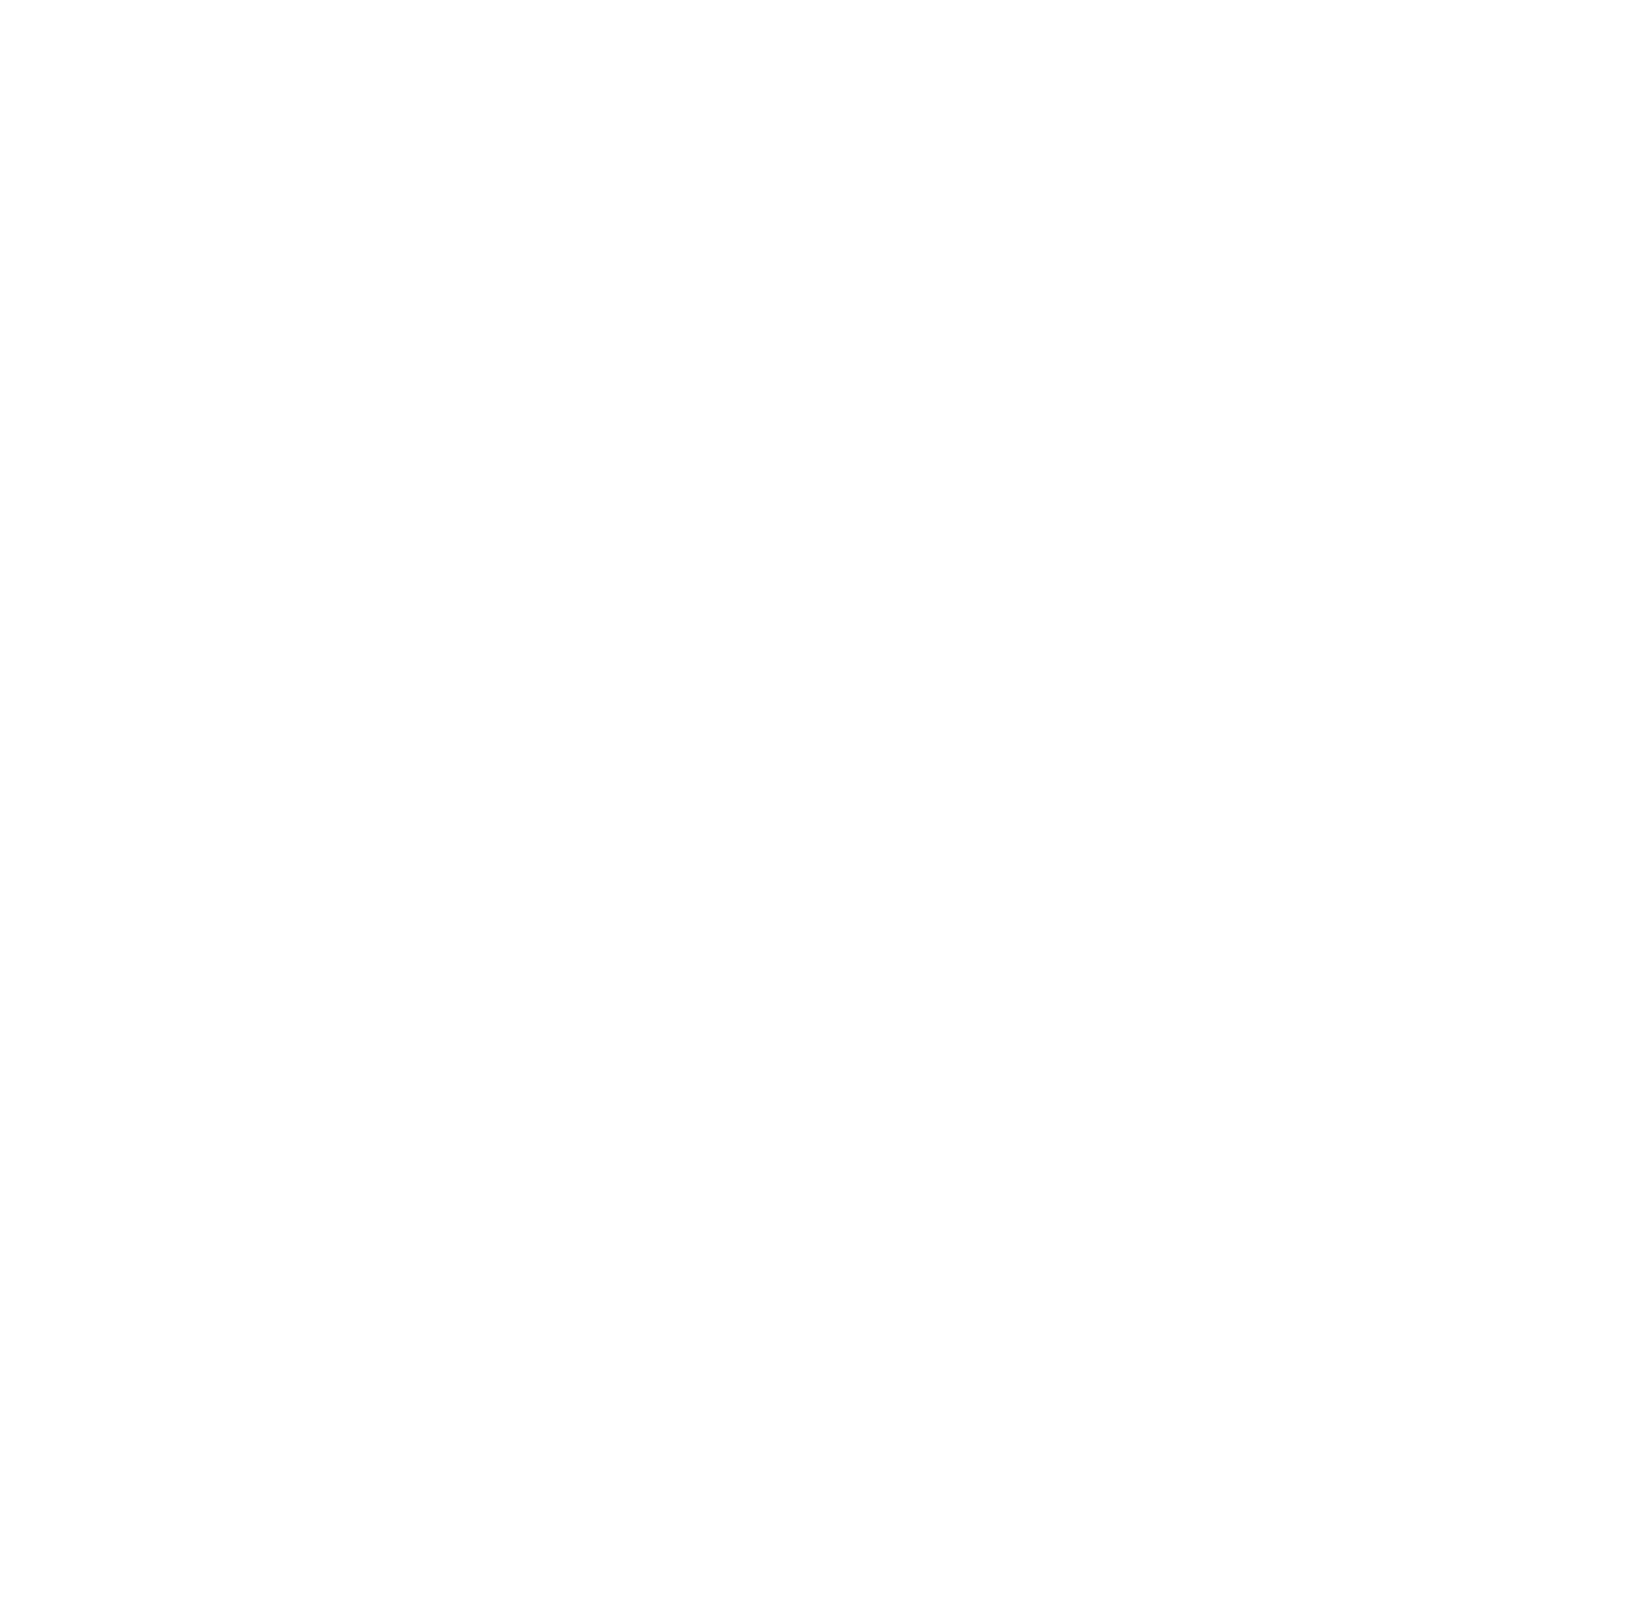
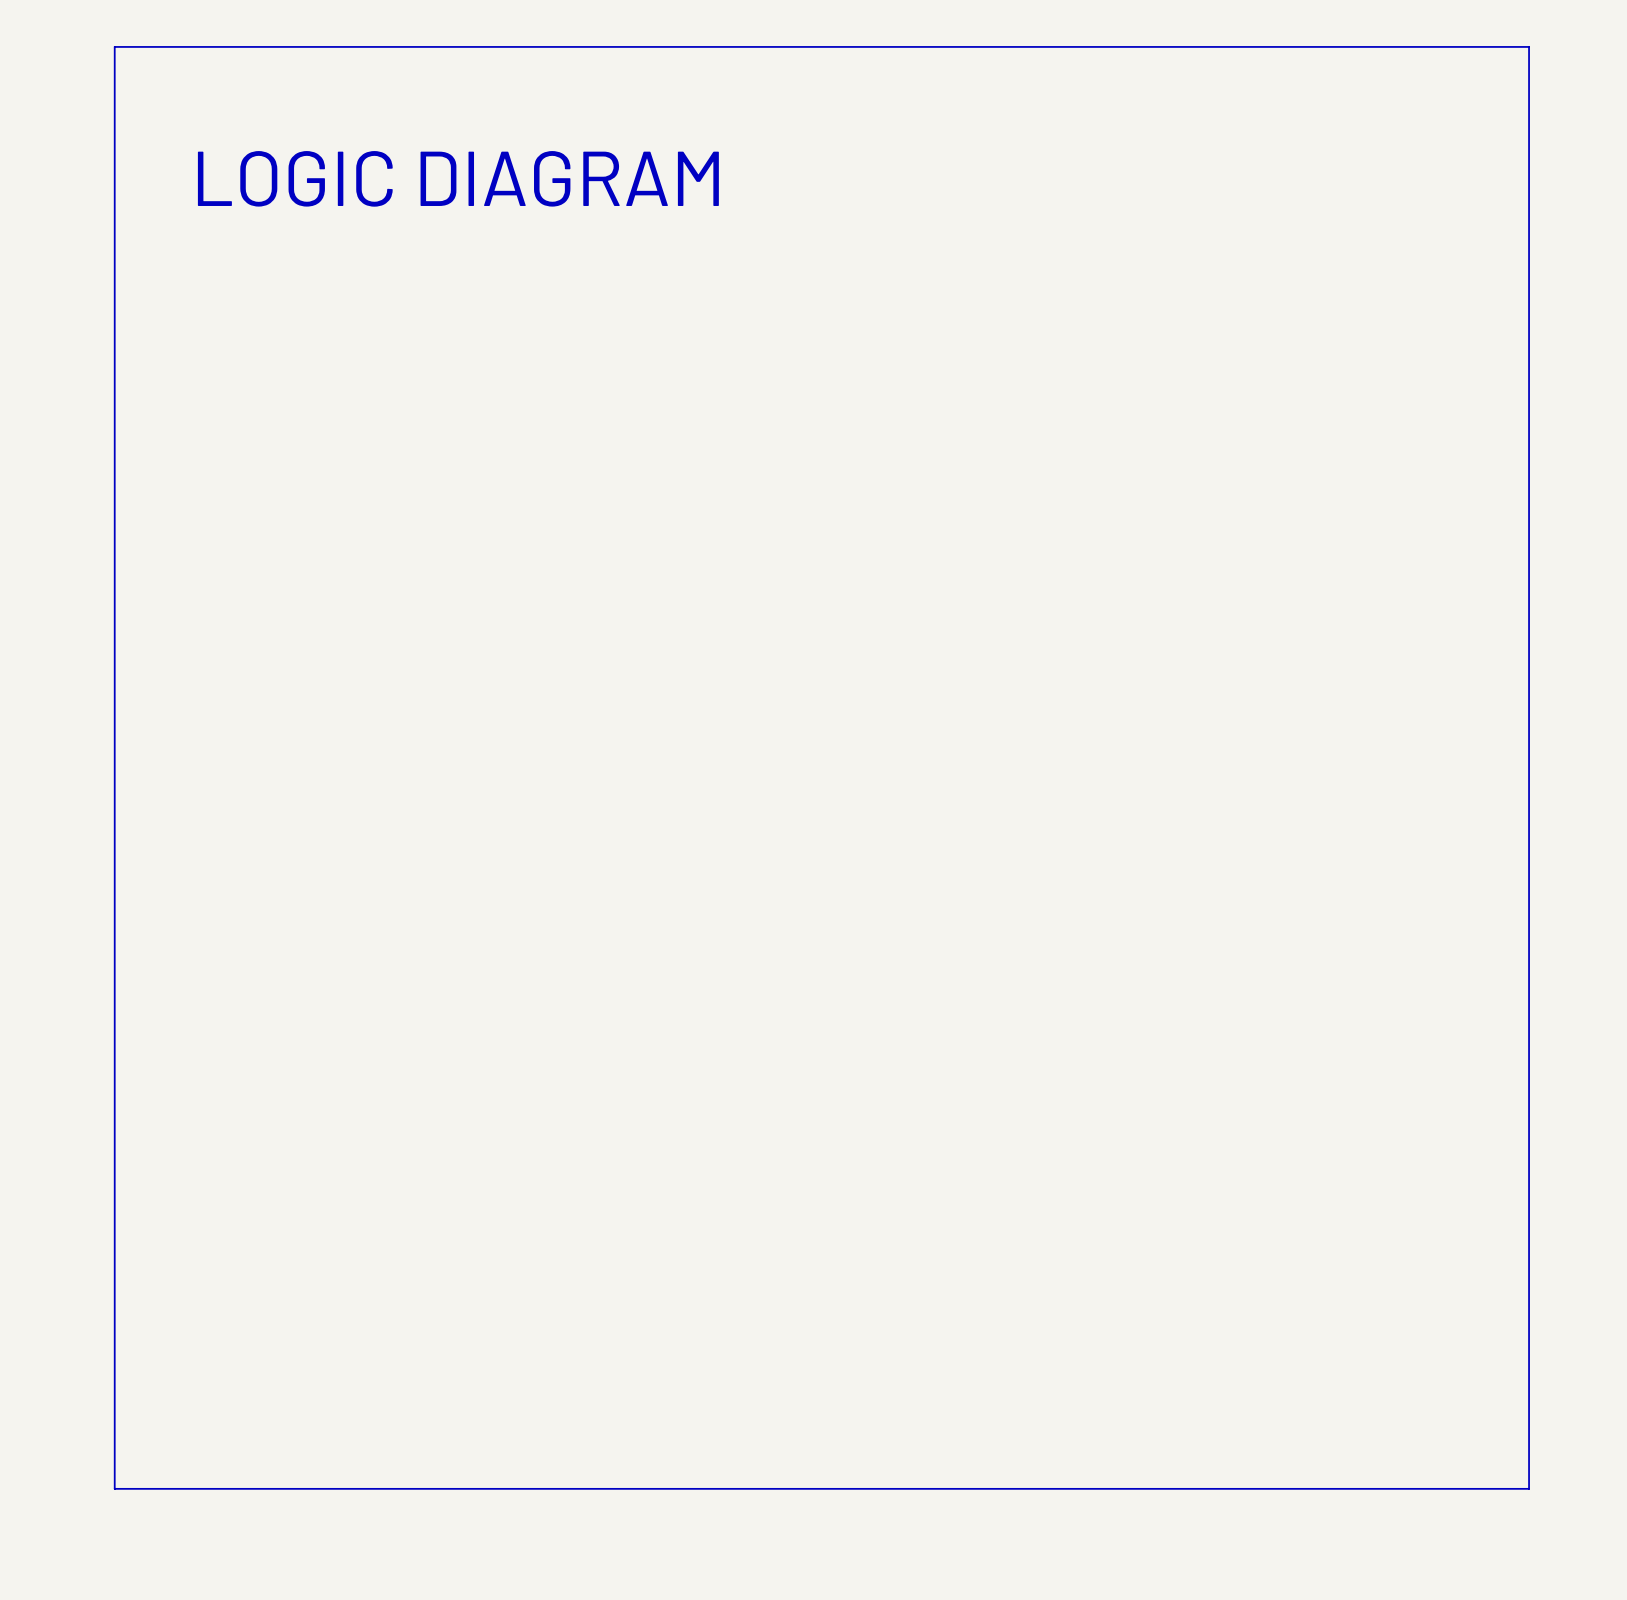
line: none -> (114, 46) (1529, 46) (1529, 1488) (114, 1488) (114, 46)
text: none -> LOGIC DIAGRAM (458, 178)

